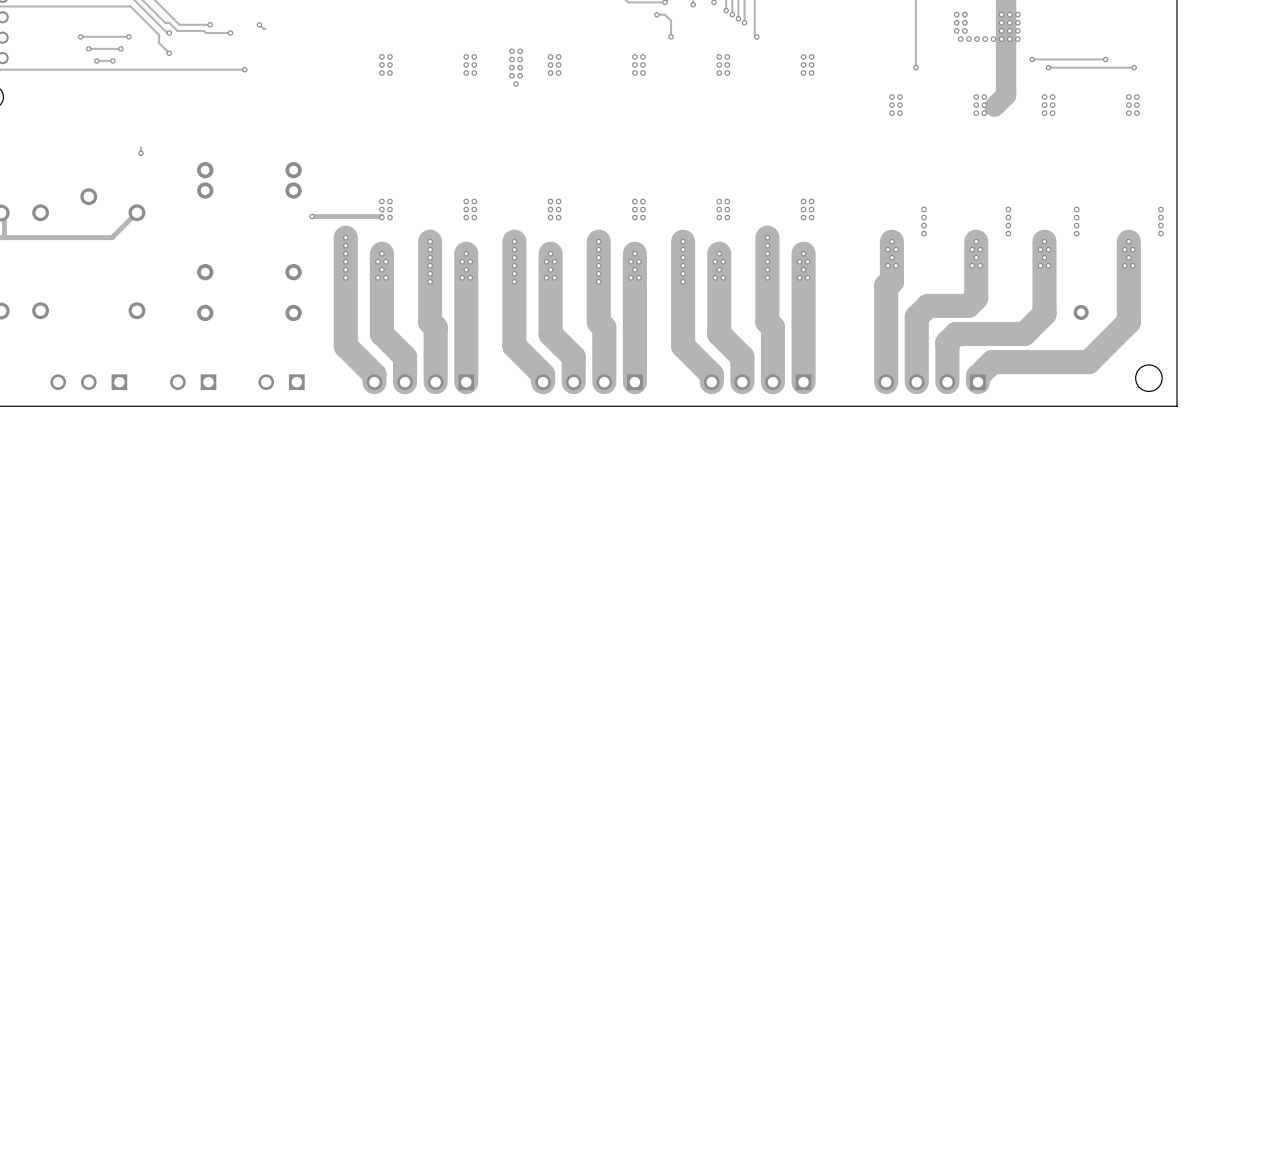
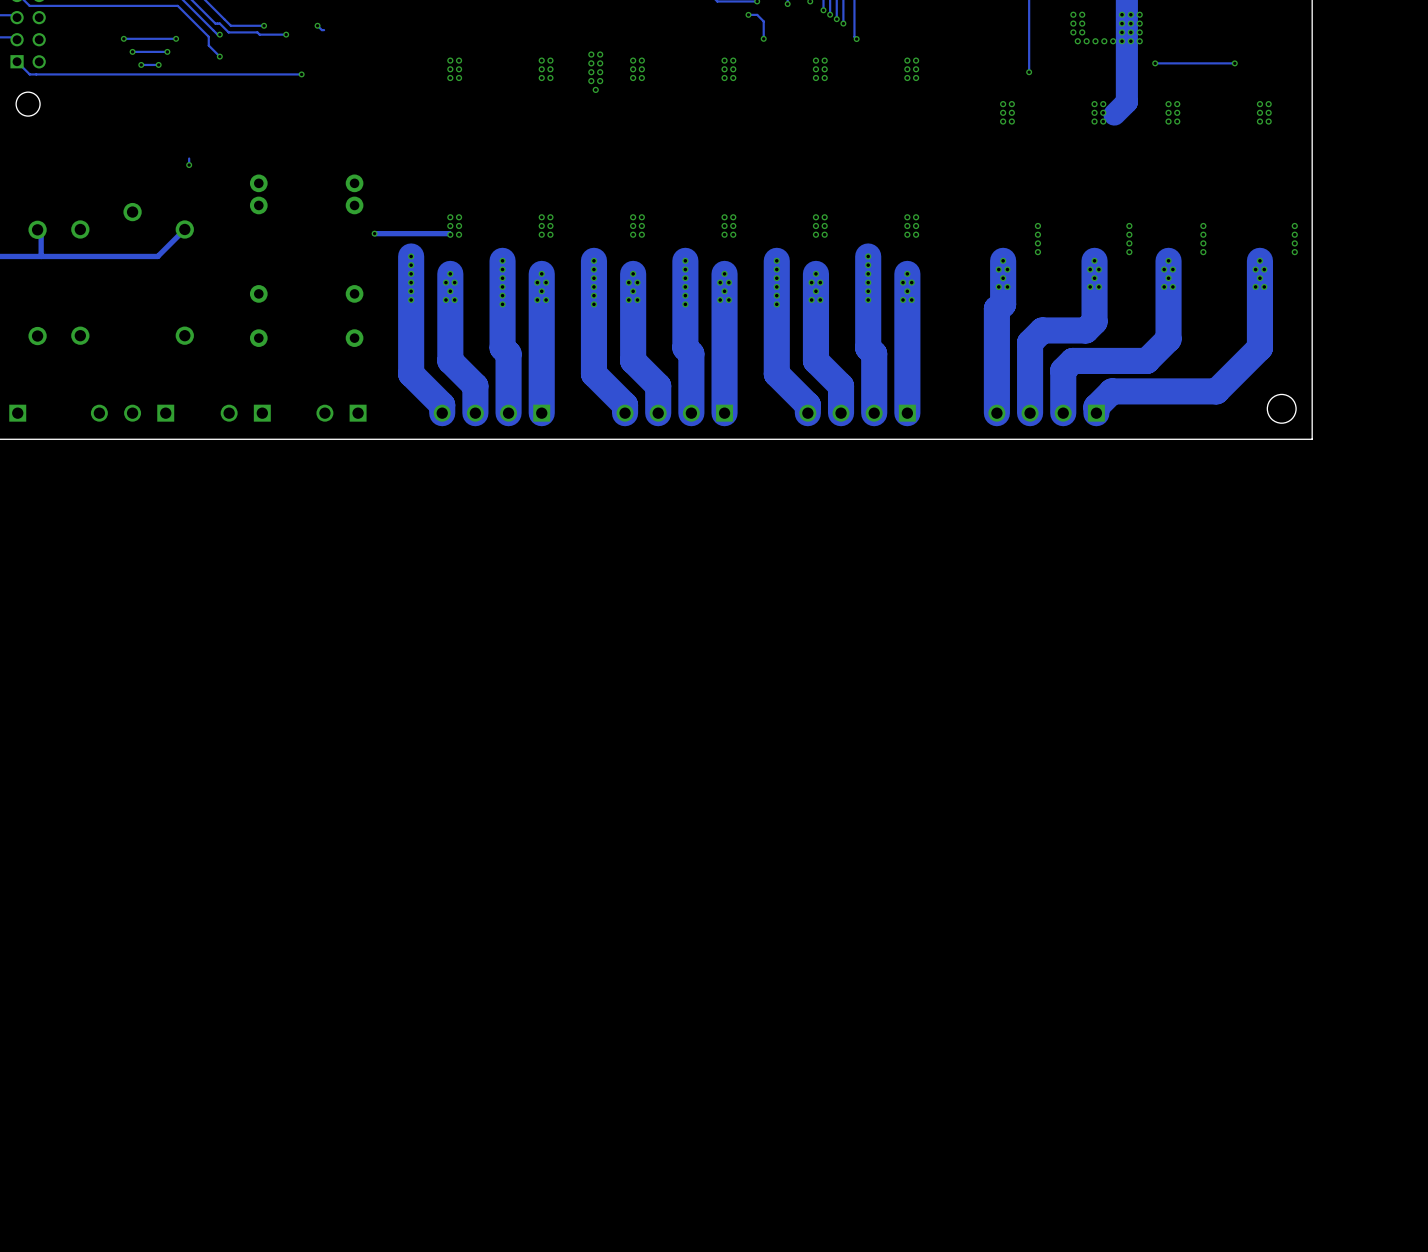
via: (1048, 67) -> none
track: (1134, 67) (1048, 67) -> none
via: (1134, 67) -> none
part: (1081, 312) -> none

